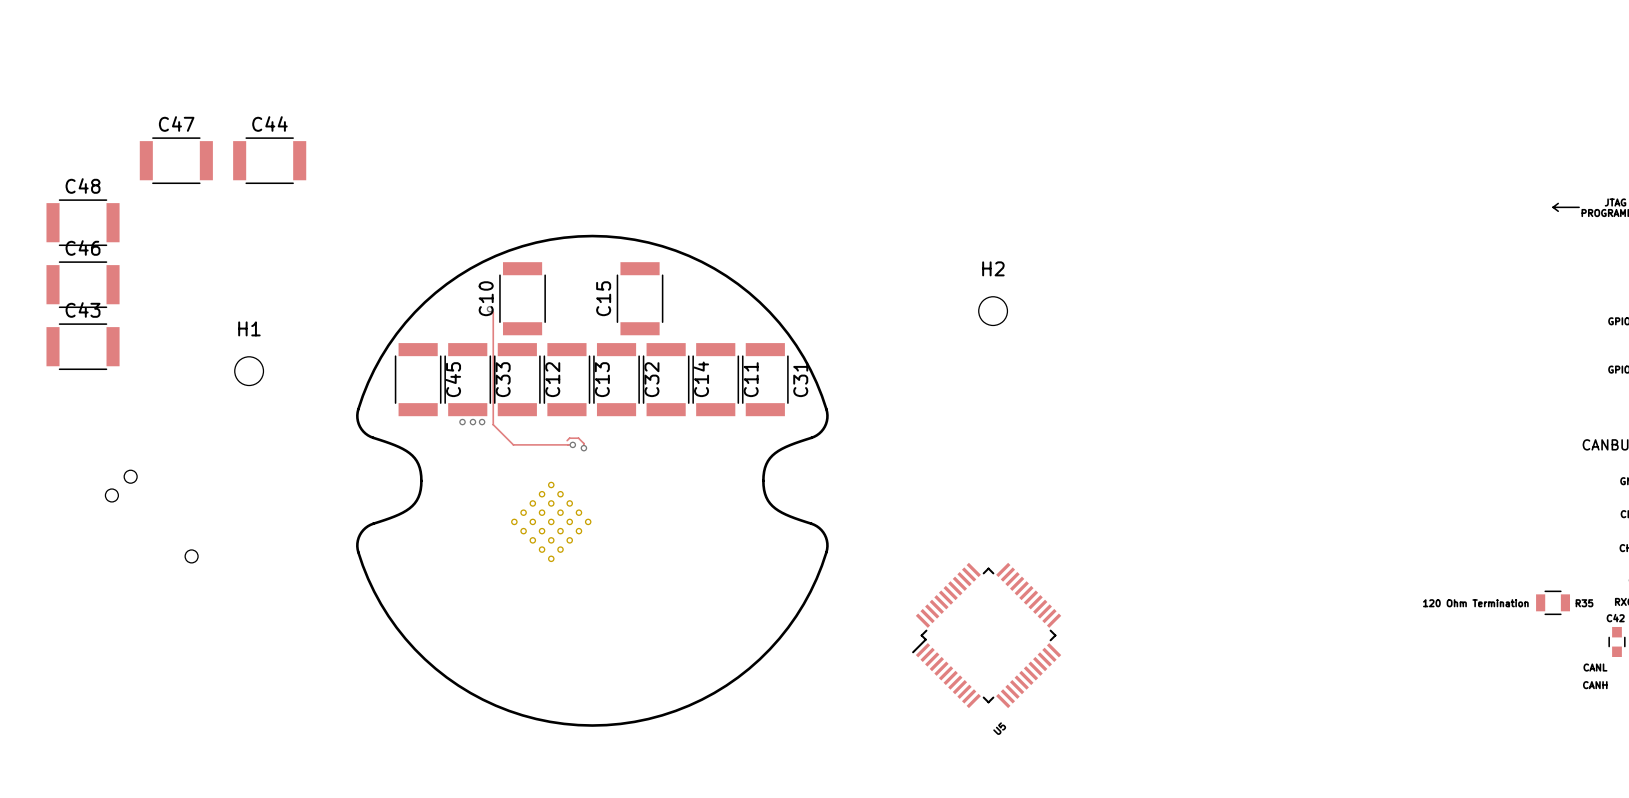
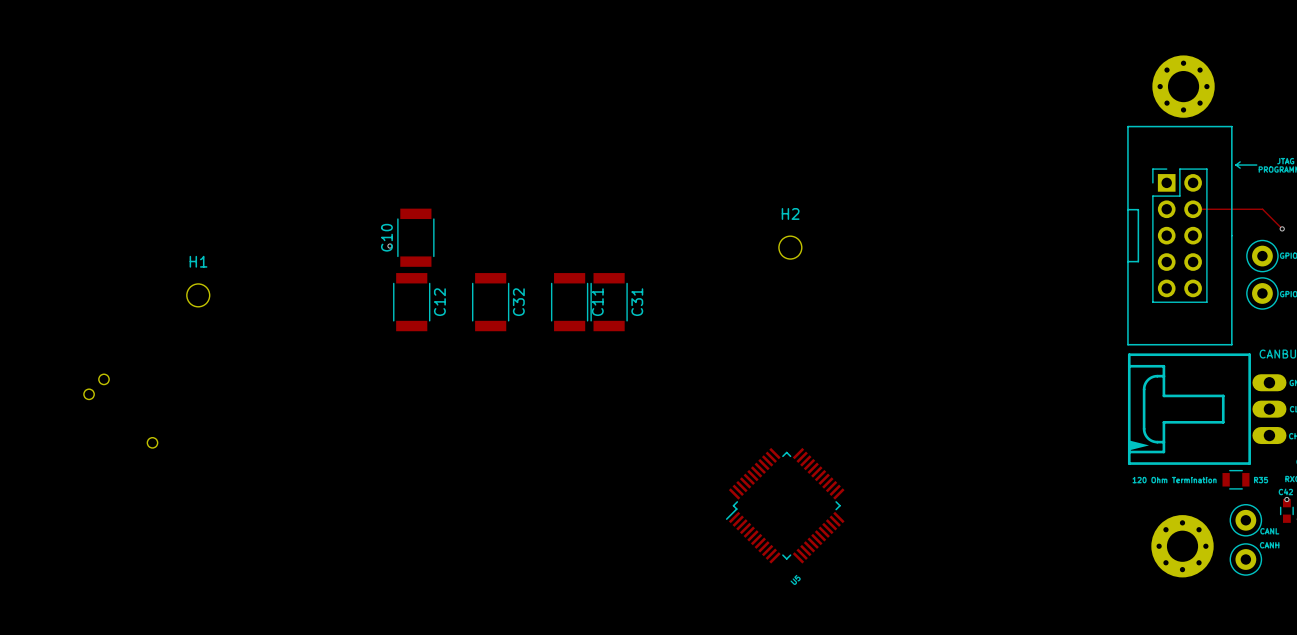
part: none -> (1183, 86)
C47: (176, 160) -> none
C44: (269, 160) -> none
C48: (83, 222) -> none
track: none -> (1193, 209) (1262, 209) (1282, 228)
C46: (83, 284) -> none
via: none -> (1282, 228)
part: none -> (1179, 235)
C15: (640, 298) -> none
track: (489, 309) (493, 312) (493, 424) (513, 444) (572, 444) -> none
part: none -> (1262, 256)
C43: (83, 346) -> none
part: none -> (1262, 293)
C45: (418, 379) -> none
C33: (467, 379) -> none
C13: (566, 379) -> none
C14: (666, 379) -> none
board edge: (358, 409) (374, 369) (388, 345) (405, 322) (435, 292) (470, 268) (509, 250) (536, 242) (564, 237) (592, 236) (620, 237) (662, 246) (688, 255) (714, 268) (749, 292) (779, 322) (796, 345) (810, 369) (826, 409) (826, 423) (816, 435) (785, 446) (772, 455) (765, 467) (763, 485) (766, 497) (775, 508) (790, 516) (814, 524) (821, 530) (826, 540) (826, 552) (810, 591) (796, 616) (779, 638) (749, 668) (714, 692) (675, 710) (648, 718) (620, 723) (592, 725) (564, 723) (522, 715) (495, 705) (470, 692) (435, 668) (405, 638) (388, 616) (374, 591) (358, 552) (358, 537) (367, 526) (398, 514) (412, 506) (419, 493) (421, 476) (418, 464) (409, 453) (394, 445) (370, 436) (363, 431) (357, 421) (358, 409) -> none
via: (462, 422) -> none
via: (472, 422) -> none
via: (482, 422) -> none
track: (567, 440) (569, 438) (578, 438) (583, 443) (583, 448) -> none
via: (572, 444) -> none
via: (583, 448) -> none
part: none -> (1207, 409)
part: (551, 521) -> none
via: none -> (1286, 499)
part: none -> (1245, 520)
part: none -> (1182, 546)
part: none -> (1245, 559)

